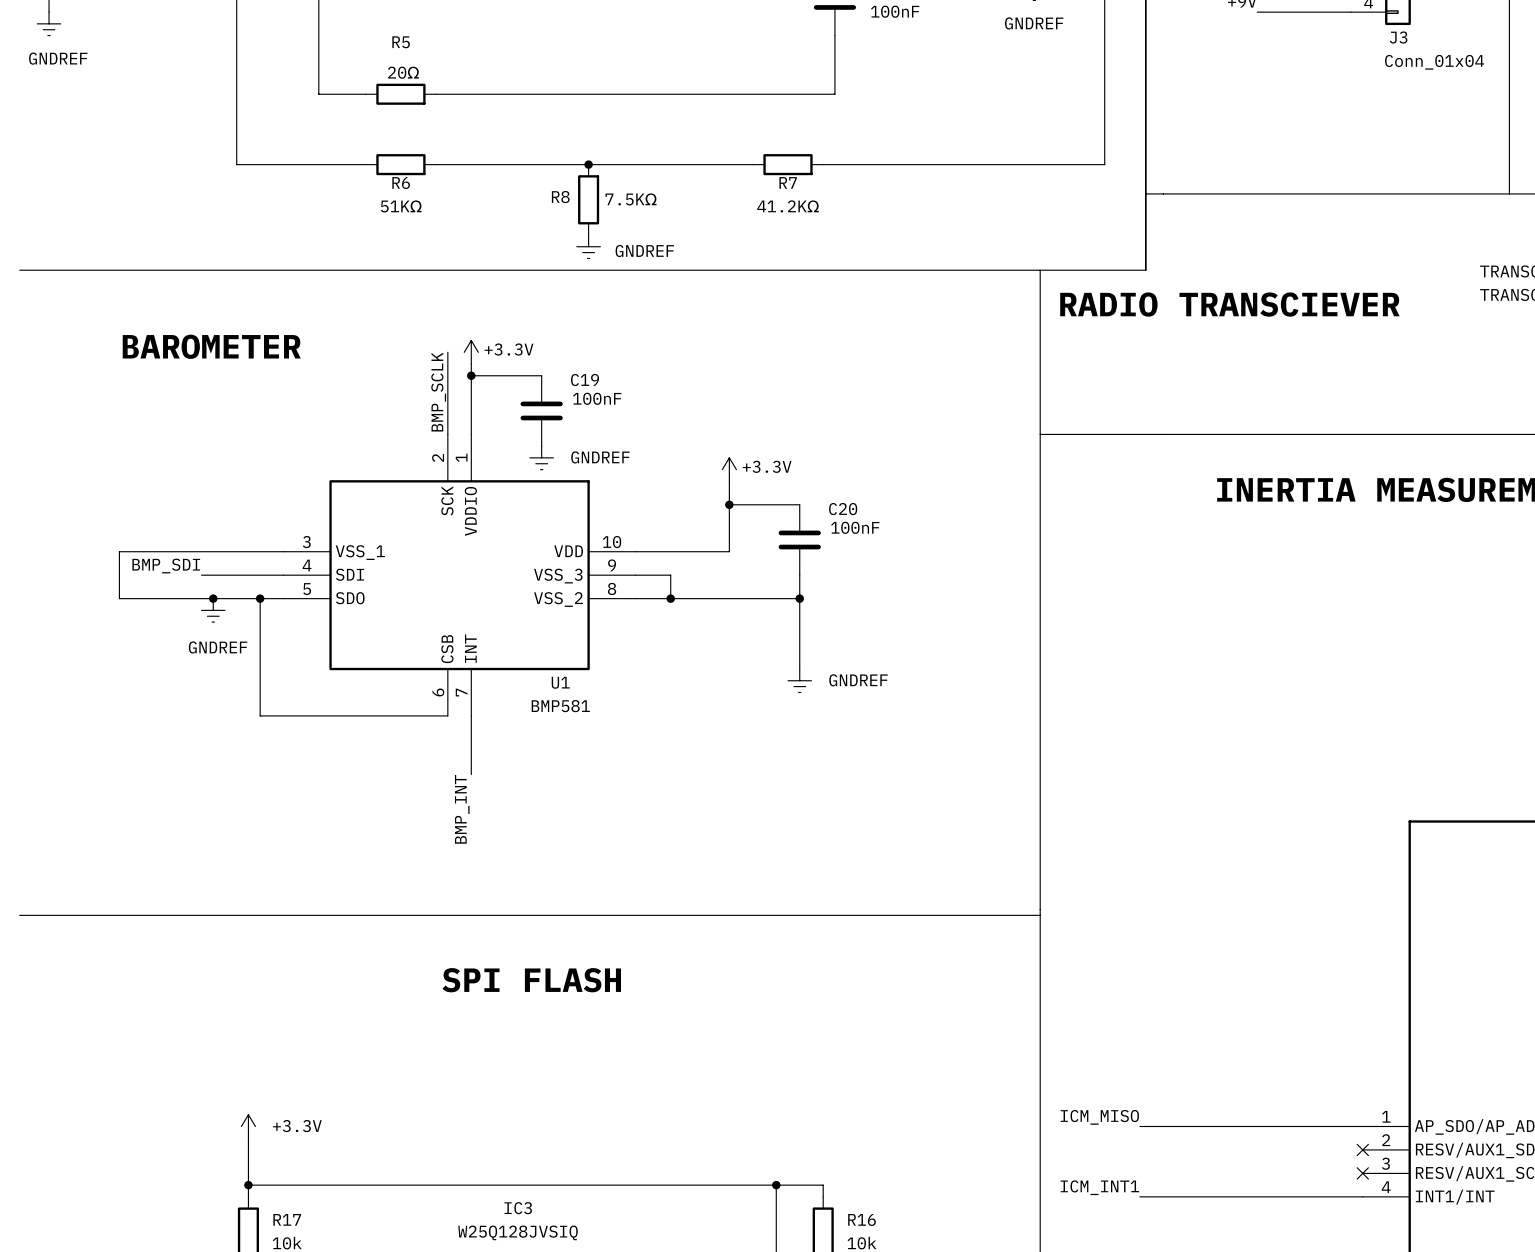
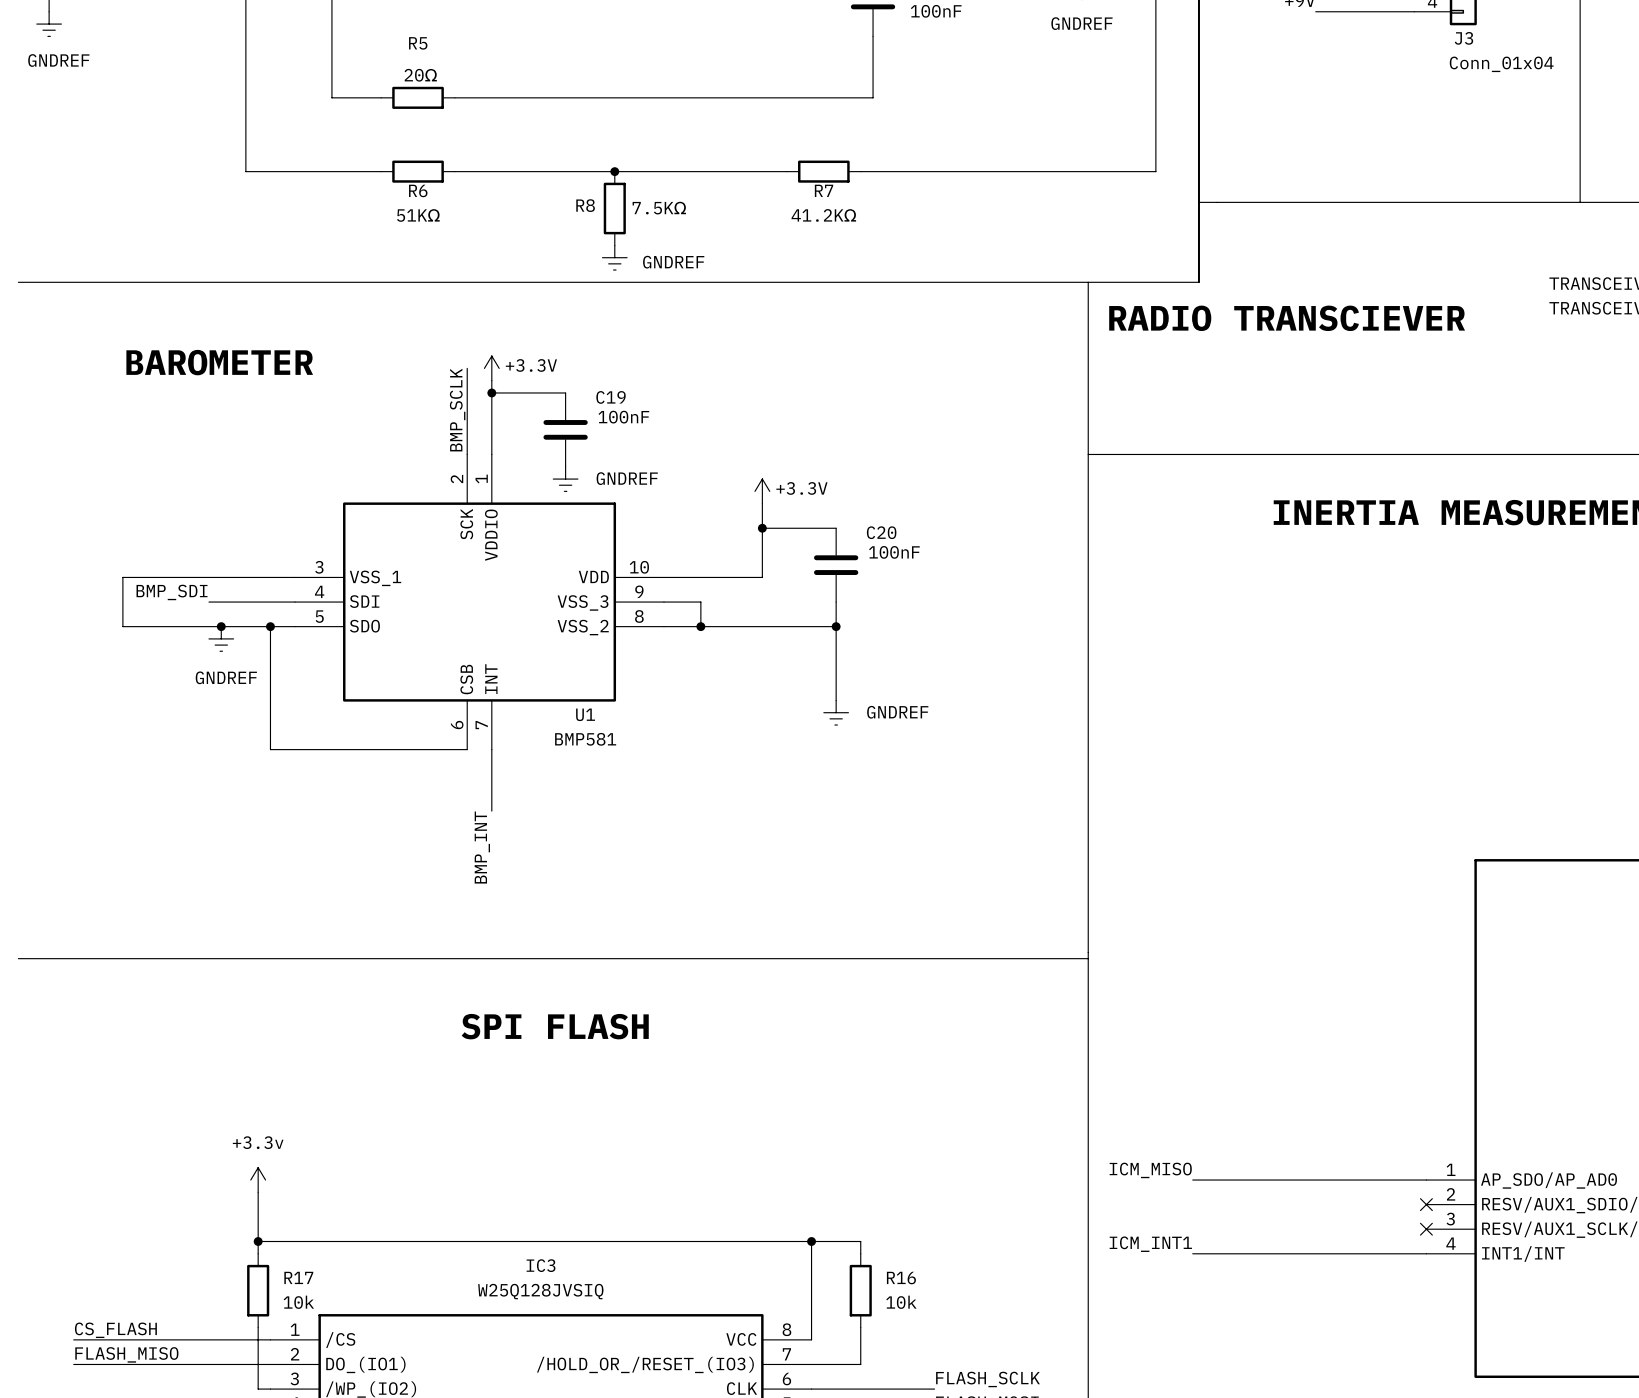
power symbol: +3.3V (248, 1126) -> +3.3v (258, 1180)

